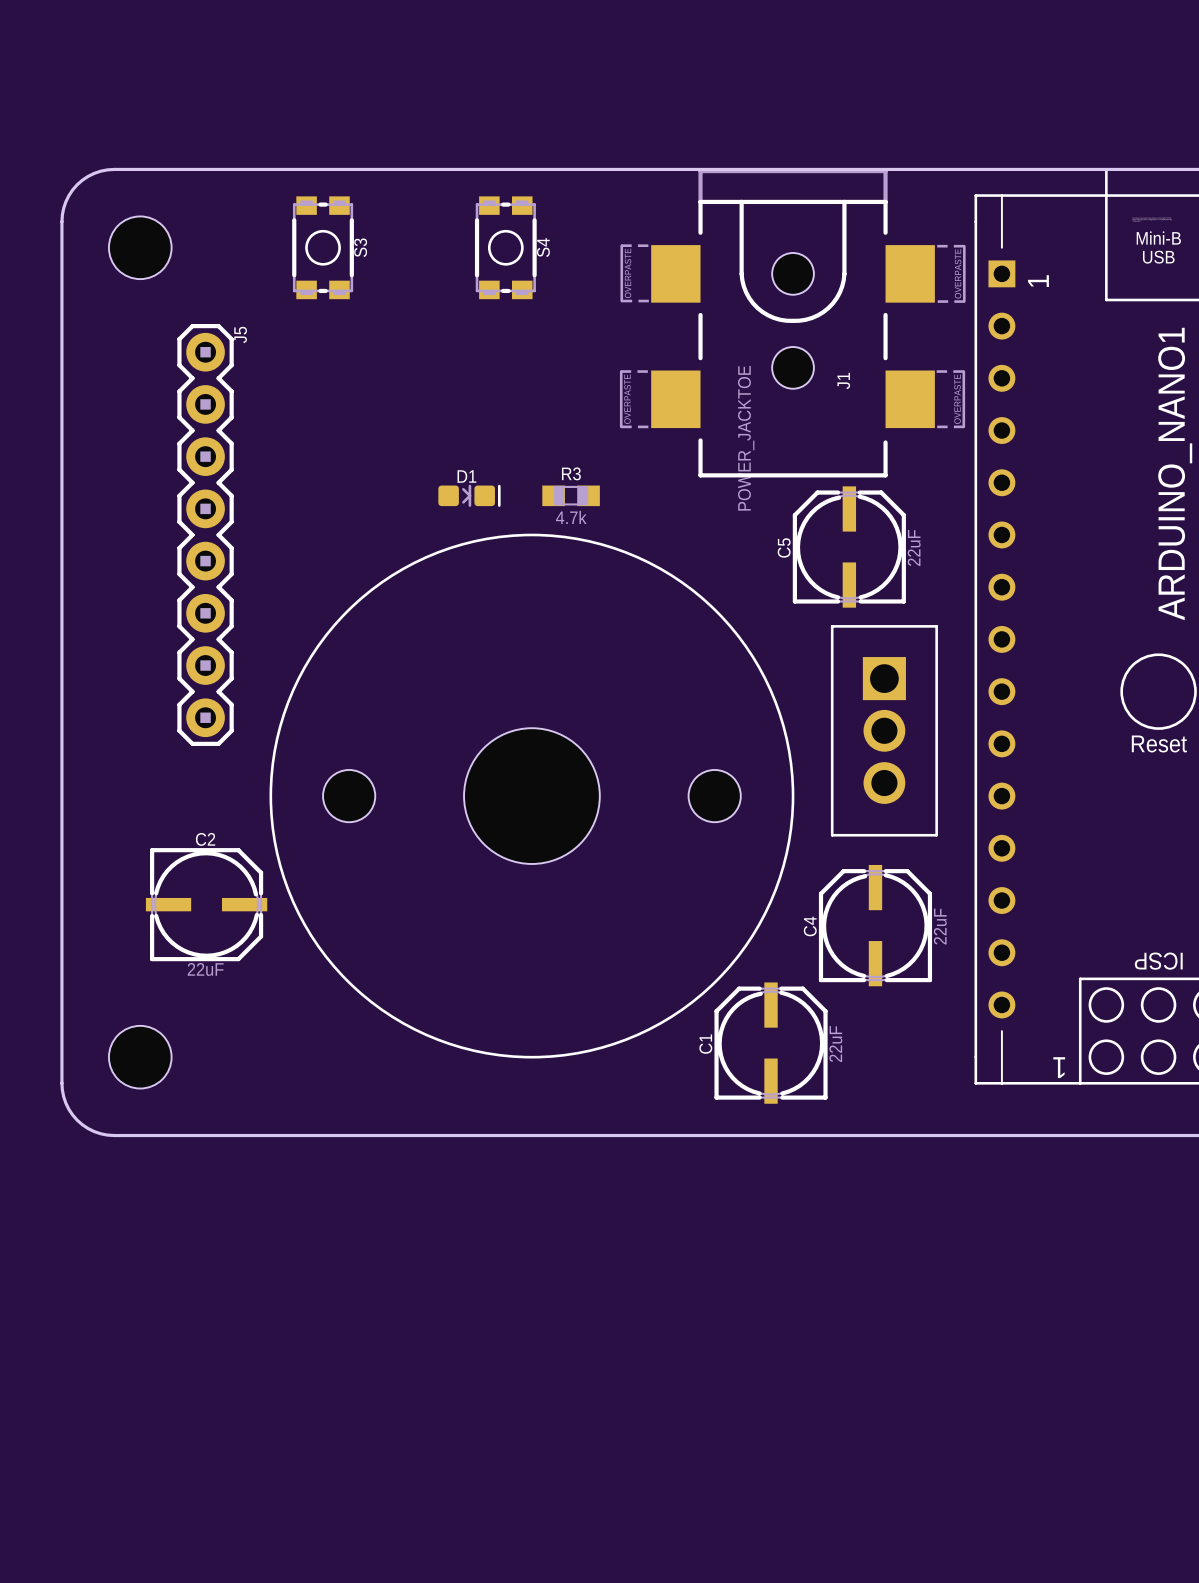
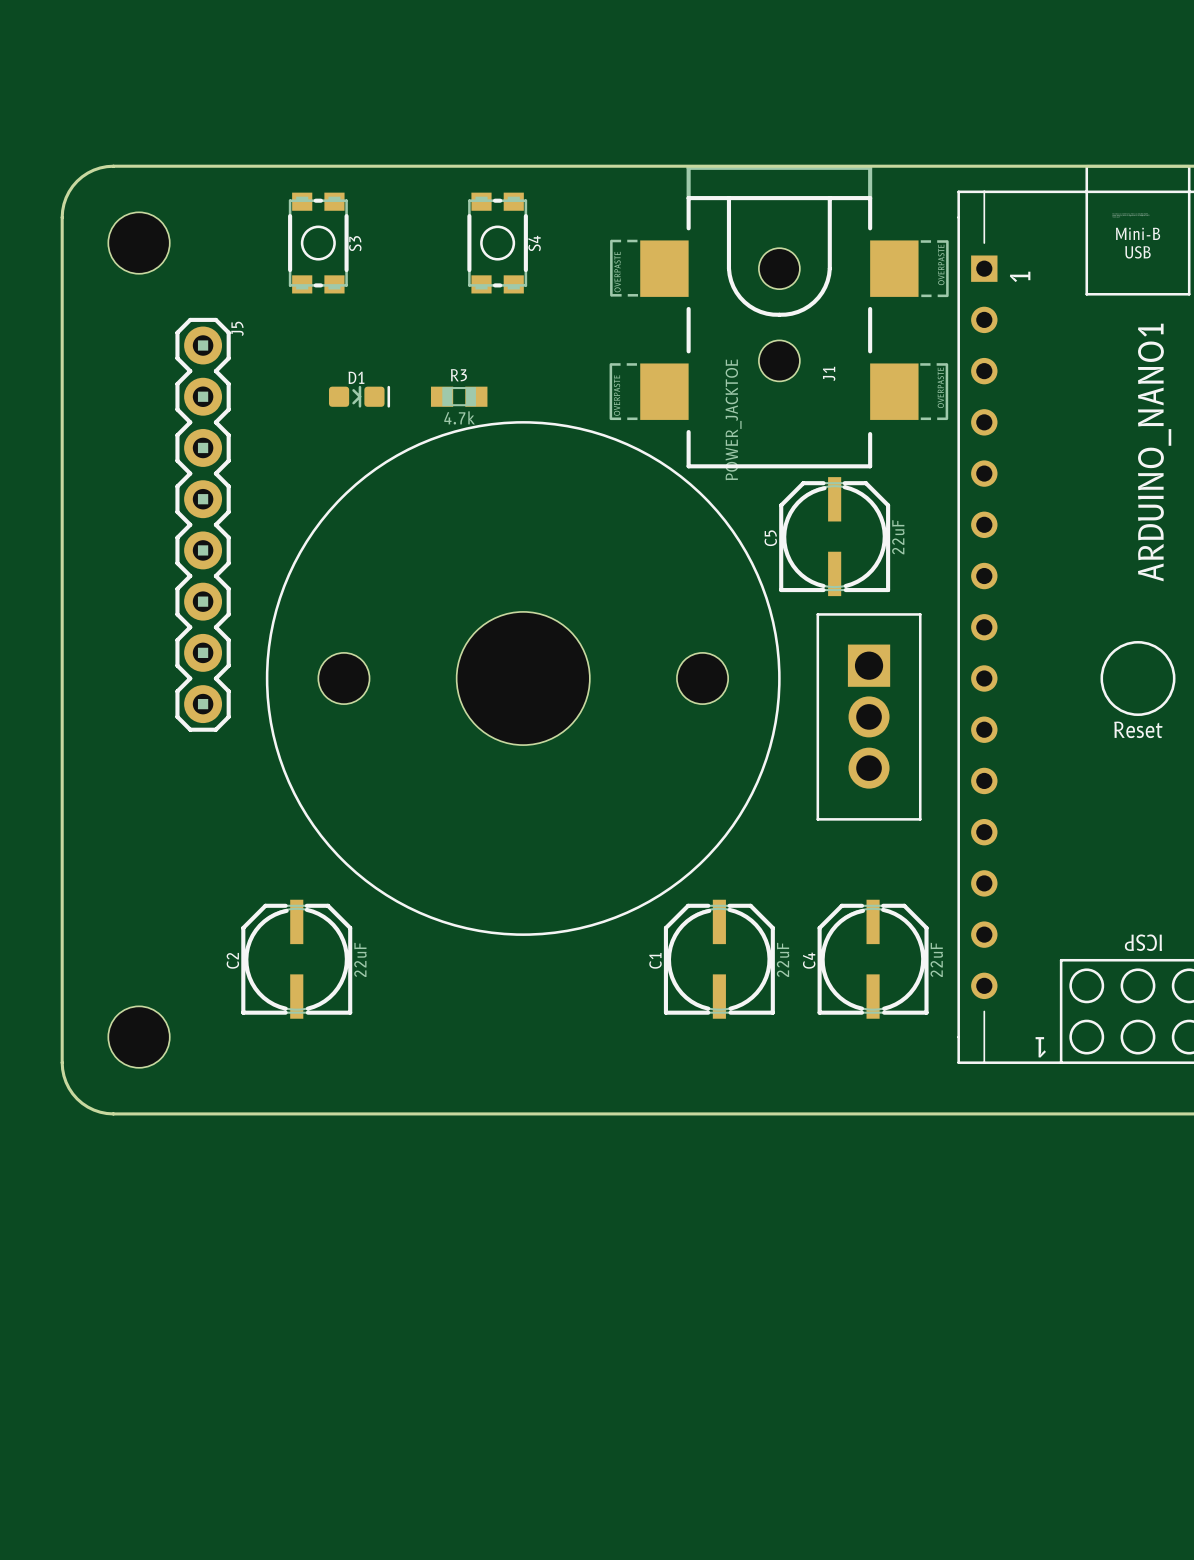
D1 position: (469, 495) -> (359, 396)
R3 position: (571, 495) -> (459, 396)
part position: (531, 796) -> (523, 678)
C2 rotation: 0° (206, 904) -> 90° counterclockwise (296, 959)
C2 position: (206, 904) -> (296, 959)
C4 position: (875, 925) -> (873, 959)
C1 position: (771, 1043) -> (719, 959)

